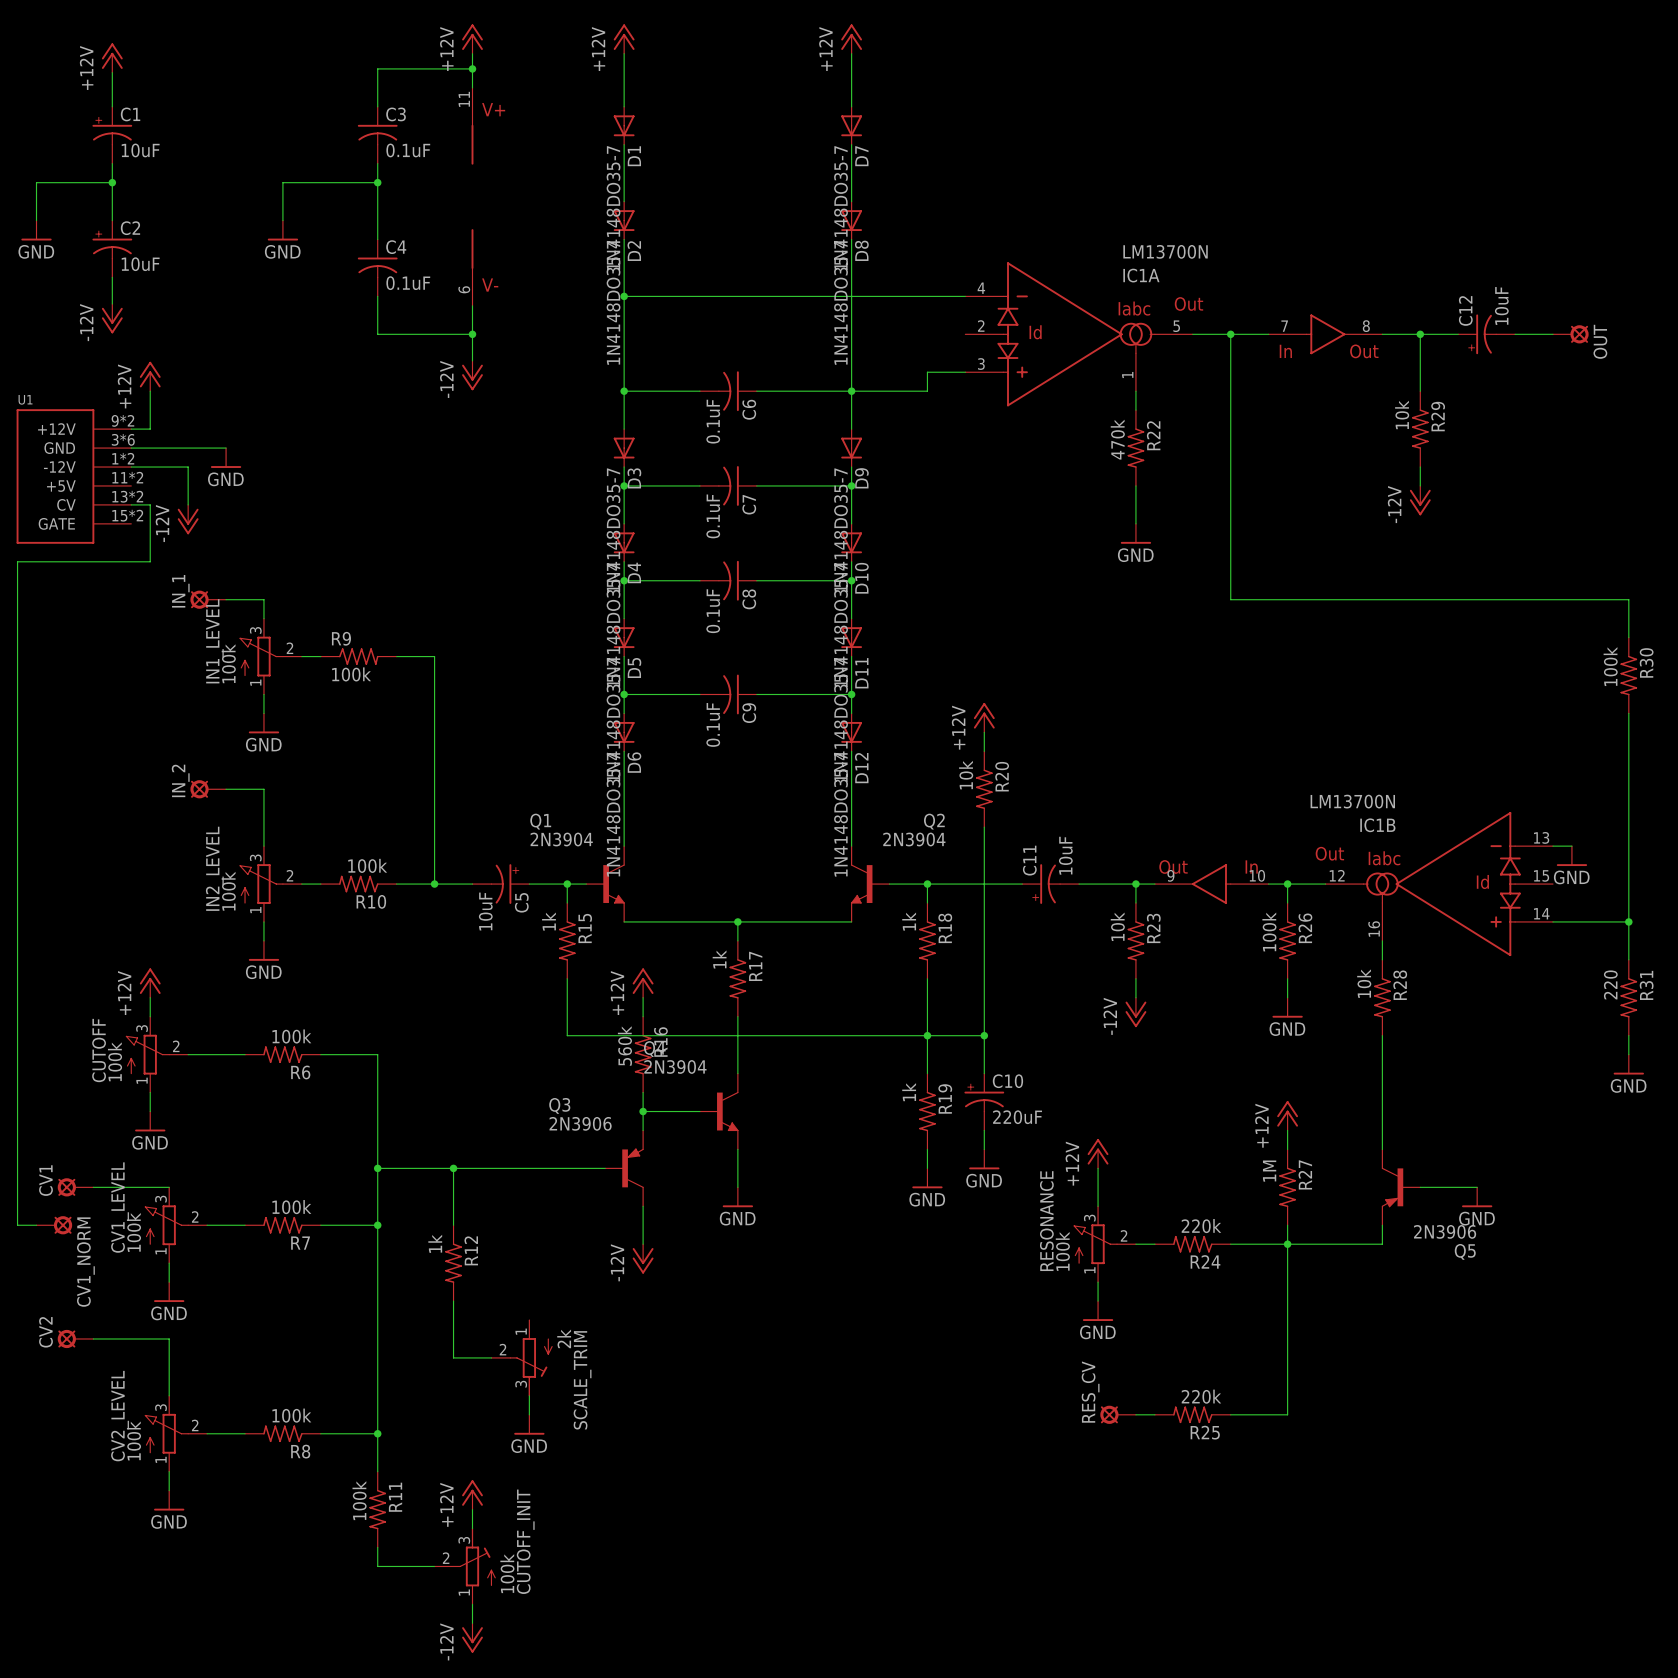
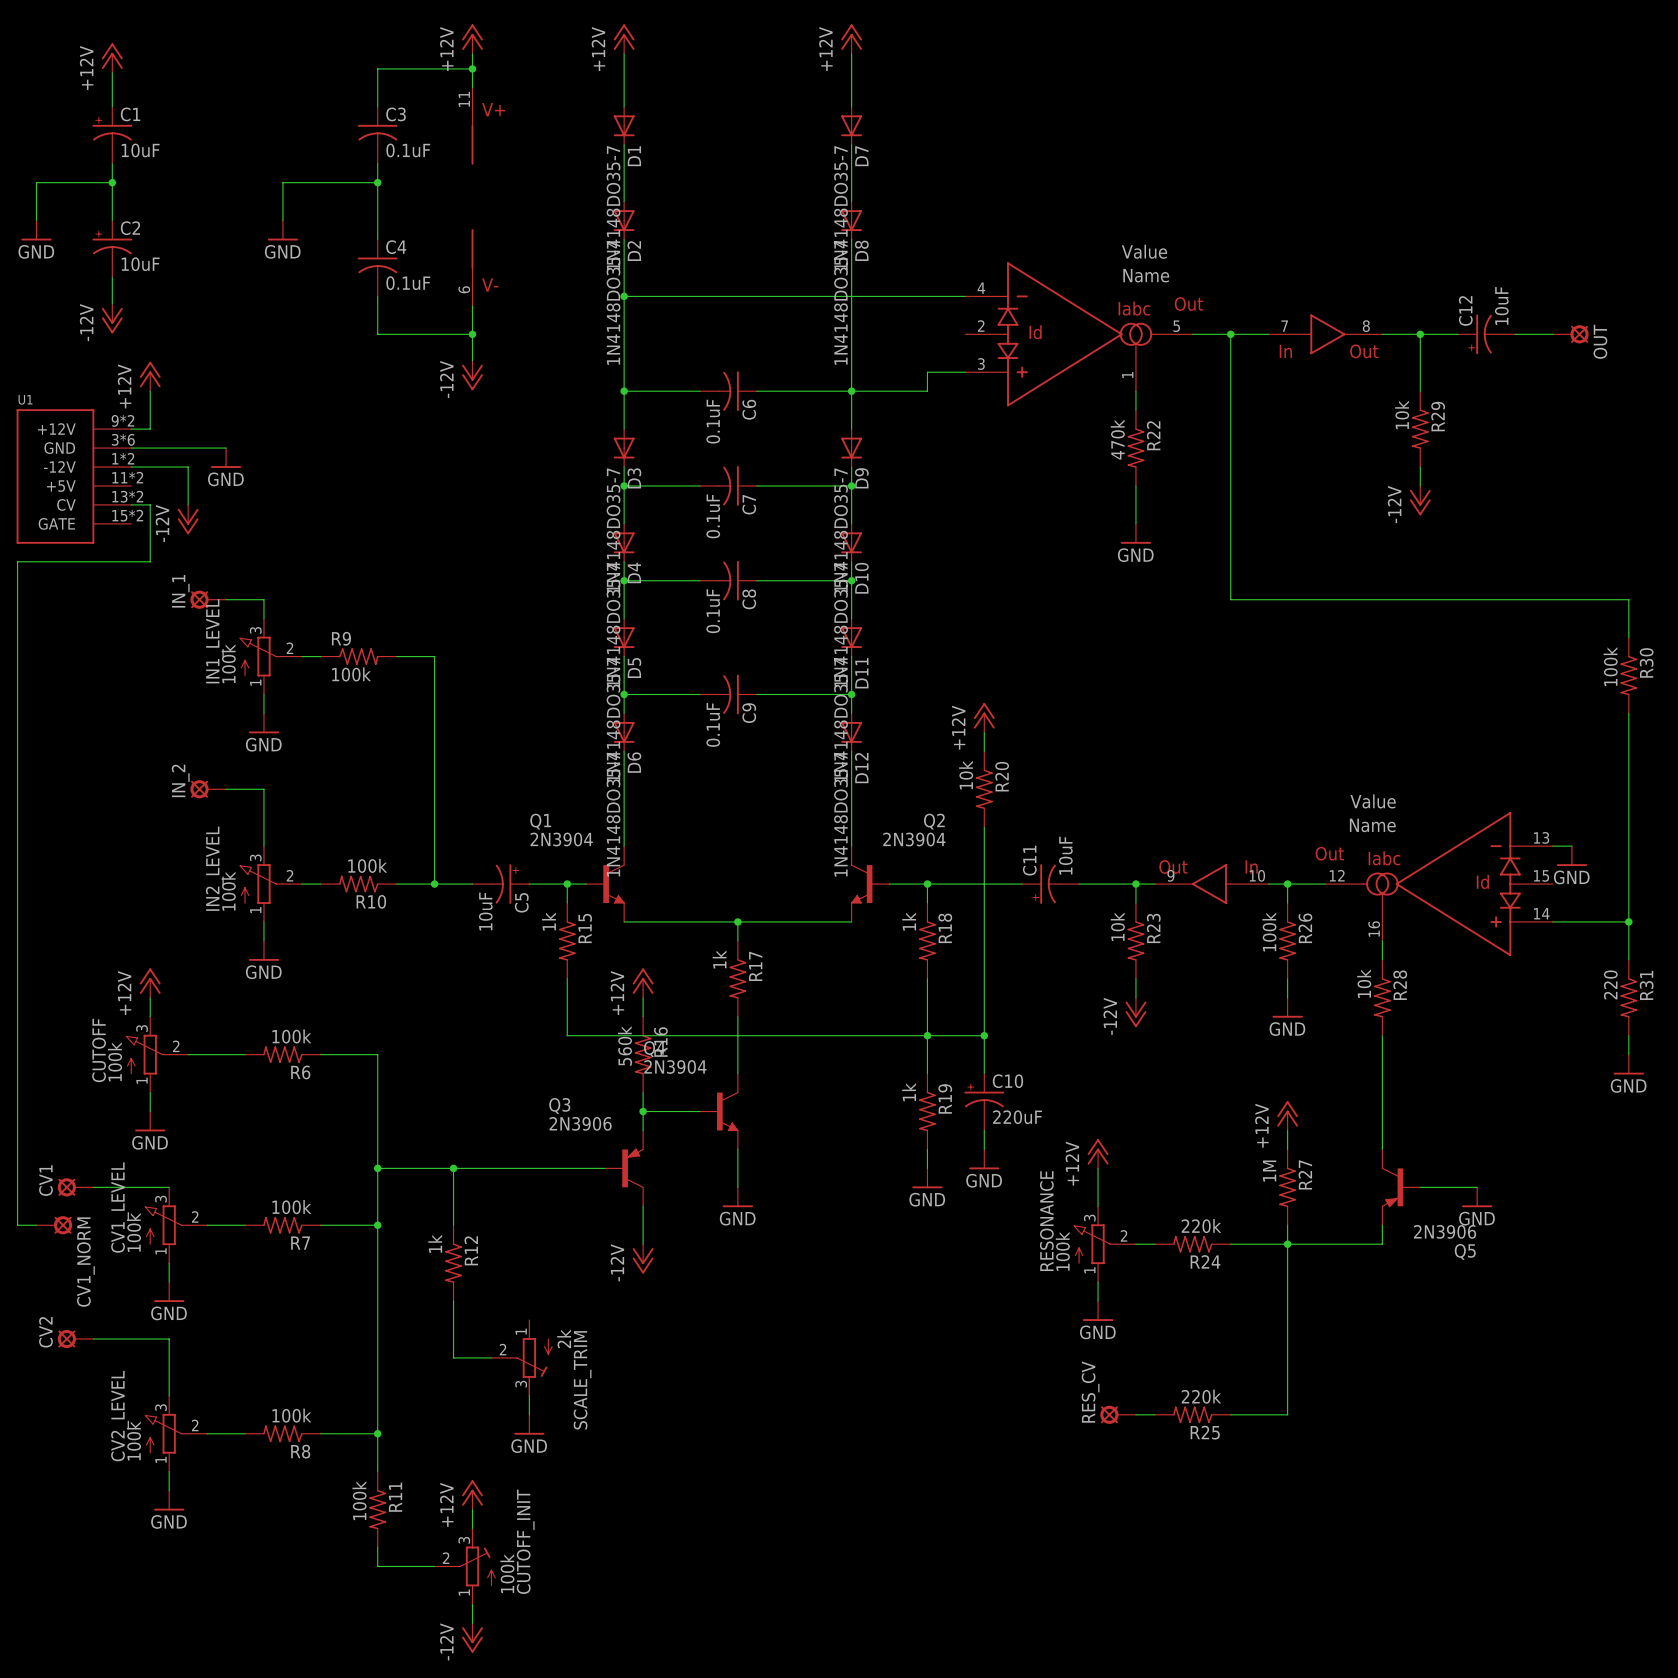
IC1A text: none -> Value (1144, 251)
IC1A value: LM13700N (1165, 251) -> none
IC1A name: IC1A (1141, 275) -> none
IC1A text: none -> Name (1146, 275)
IC1B value: LM13700N (1352, 801) -> none
IC1B text: none -> Value (1373, 801)
IC1B text: none -> Name (1372, 825)
IC1B name: IC1B (1377, 825) -> none

